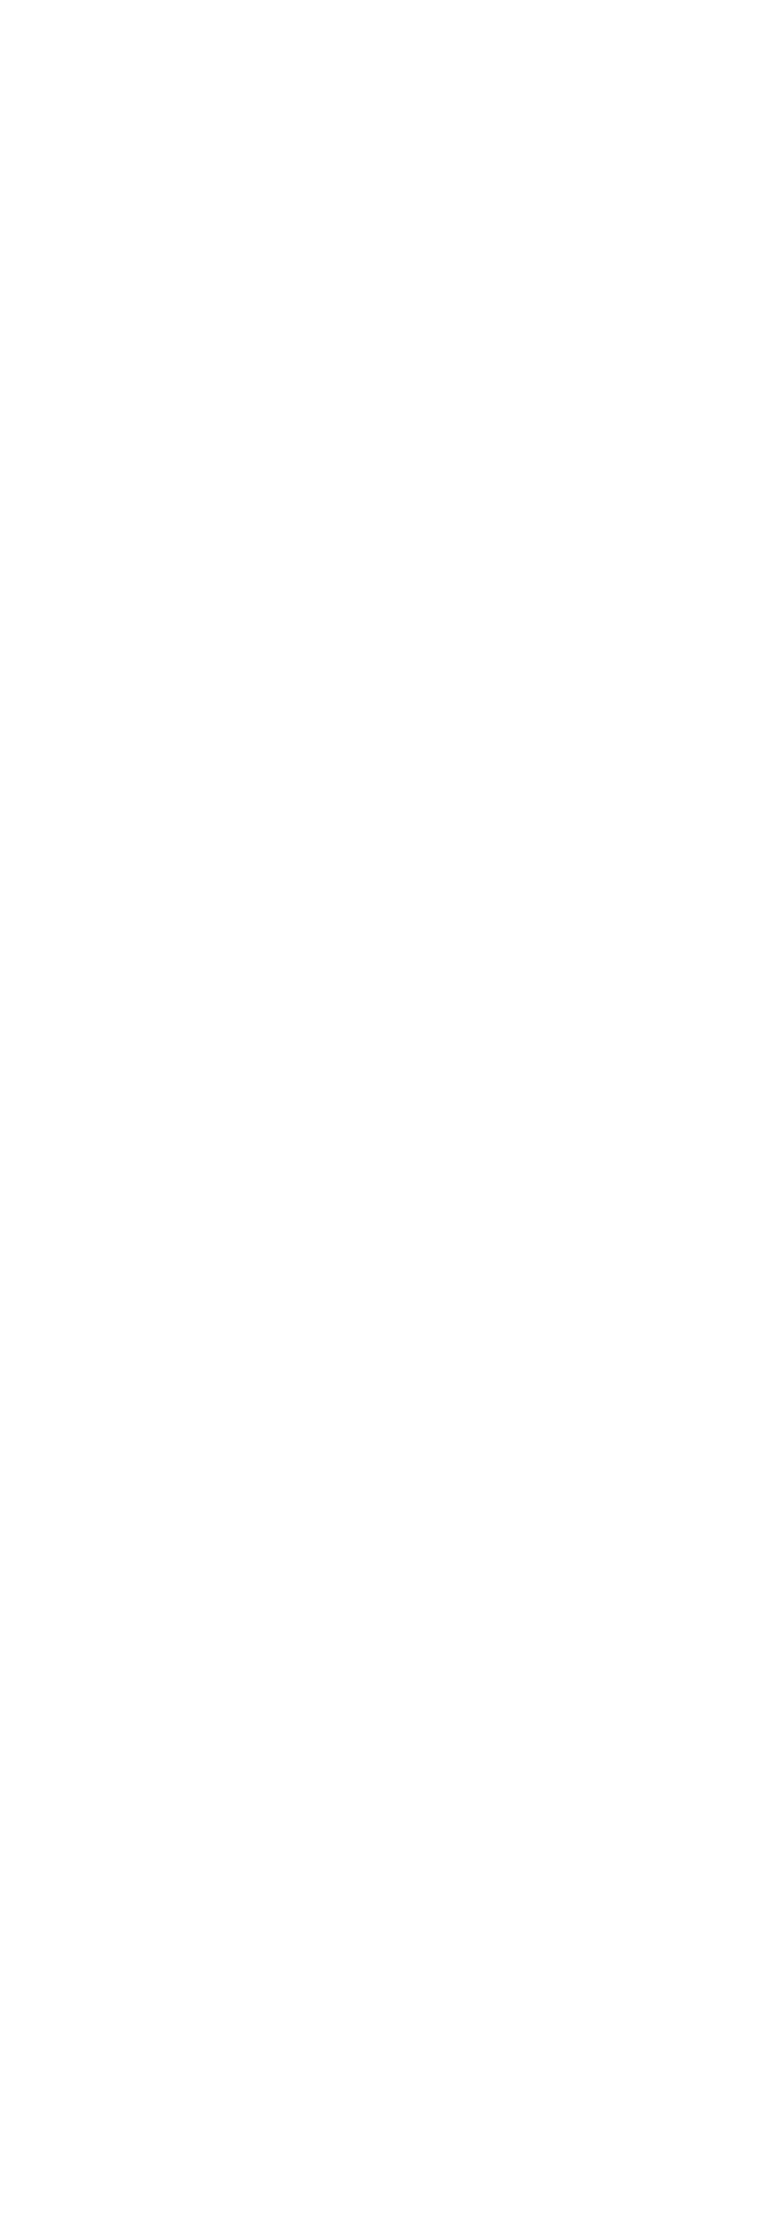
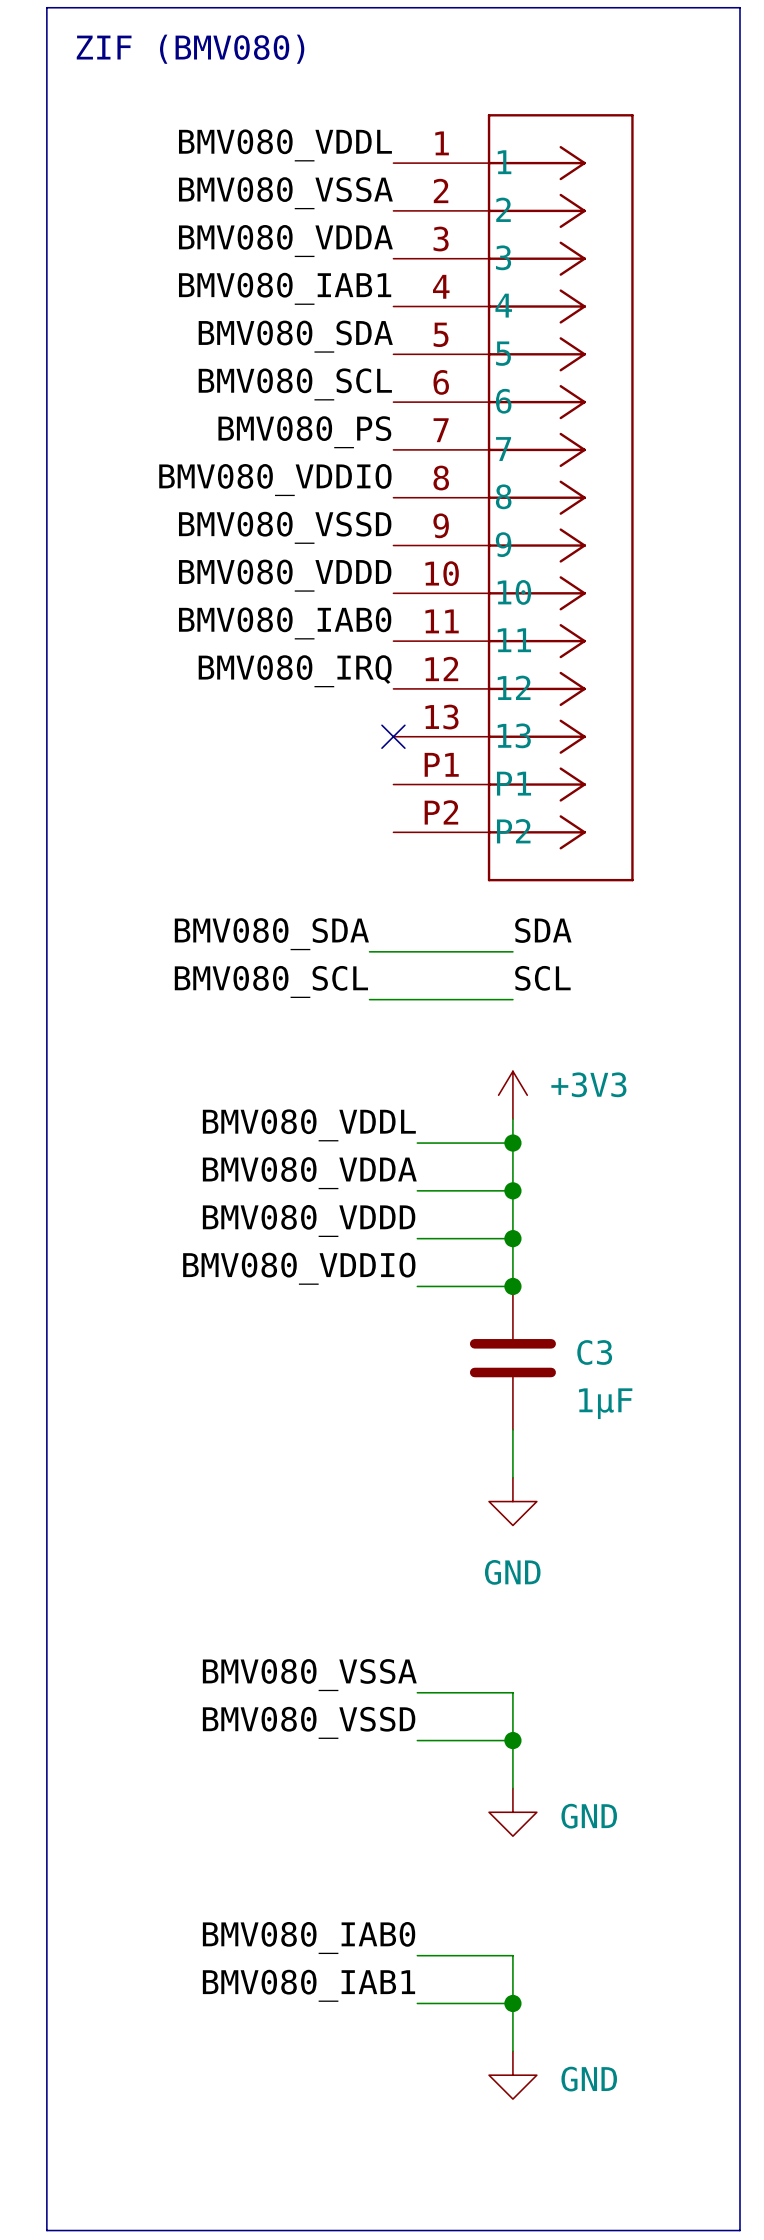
line: none -> (46, 7) (739, 7) (739, 2230) (46, 2230) (46, 7)
text: none -> ZIF (BMV080) (190, 49)
label: none -> BMV080_VDDL (285, 145)
label: none -> BMV080_VSSA (285, 193)
label: none -> BMV080_VDDA (285, 241)
label: none -> BMV080_IAB1 (285, 288)
label: none -> BMV080_SDA (295, 336)
label: none -> BMV080_SCL (295, 384)
label: none -> BMV080_PS (304, 432)
label: none -> BMV080_VDDIO (275, 480)
part: none -> (513, 497)
label: none -> BMV080_VSSD (285, 527)
label: none -> BMV080_VDDD (285, 575)
label: none -> BMV080_IAB0 (285, 623)
label: none -> BMV080_IRQ (295, 671)
no-connect mark: none -> (393, 736)
label: none -> SDA (543, 930)
label: none -> BMV080_SDA (271, 934)
wire: none -> (369, 951) (512, 951)
label: none -> SCL (542, 978)
label: none -> BMV080_SCL (271, 981)
wire: none -> (369, 999) (512, 999)
power symbol: none -> +3V3 (512, 1095)
wire: none -> (512, 1119) (512, 1286) (417, 1286)
label: none -> BMV080_VDDL (309, 1125)
wire: none -> (417, 1143) (512, 1143)
junction: none -> (512, 1143)
label: none -> BMV080_VDDA (309, 1173)
wire: none -> (417, 1190) (512, 1190)
junction: none -> (512, 1190)
label: none -> BMV080_VDDD (309, 1220)
wire: none -> (417, 1238) (512, 1238)
junction: none -> (512, 1238)
label: none -> BMV080_VDDIO (299, 1268)
junction: none -> (512, 1286)
C3: none -> 1µF (512, 1358)
wire: none -> (512, 1429) (512, 1477)
power symbol: none -> GND (512, 1501)
label: none -> BMV080_VSSA (309, 1675)
wire: none -> (417, 1692) (512, 1692) (512, 1788)
label: none -> BMV080_VSSD (309, 1722)
wire: none -> (417, 1740) (512, 1740)
junction: none -> (512, 1740)
power symbol: none -> GND (512, 1812)
label: none -> BMV080_IAB0 (309, 1938)
wire: none -> (417, 1955) (512, 1955) (512, 2051)
label: none -> BMV080_IAB1 (308, 1985)
wire: none -> (417, 2003) (512, 2003)
junction: none -> (512, 2003)
power symbol: none -> GND (512, 2075)

